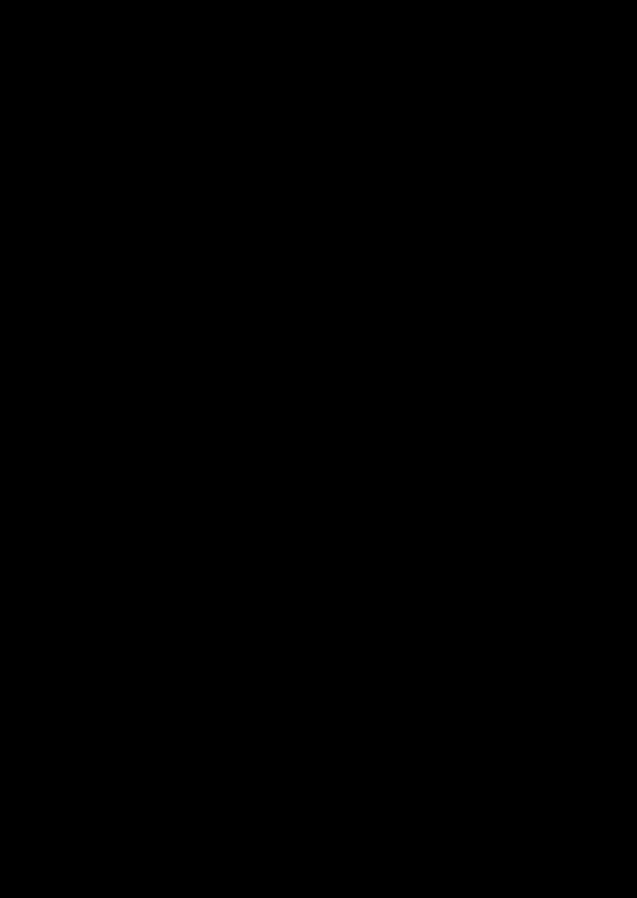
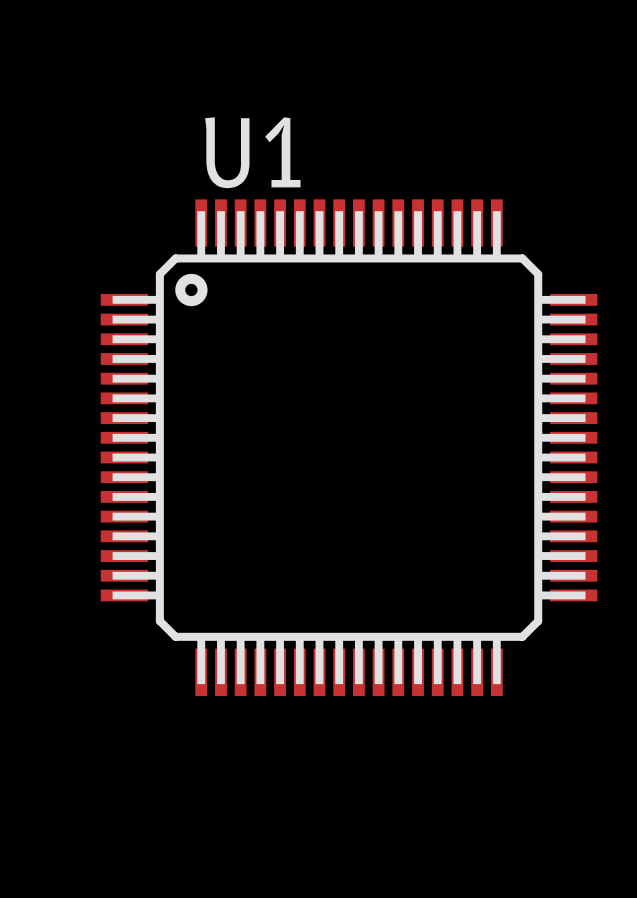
U1: none -> (349, 447)

